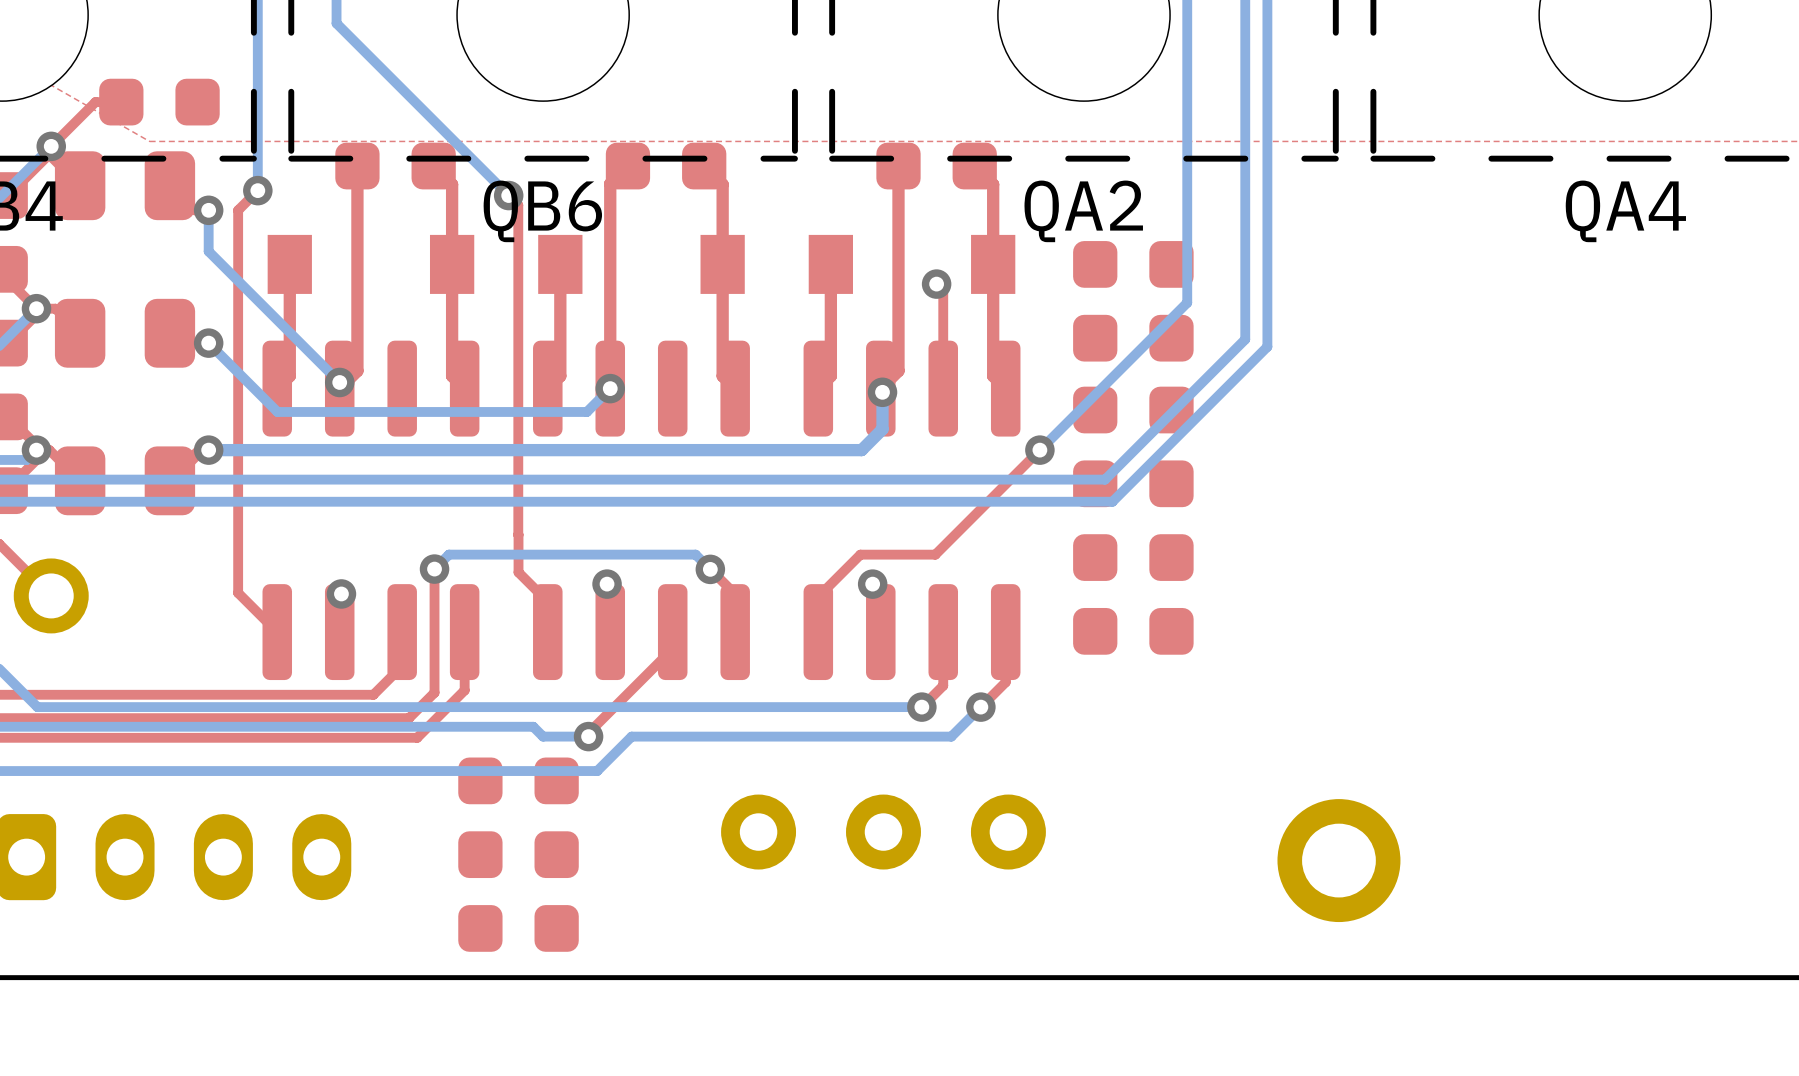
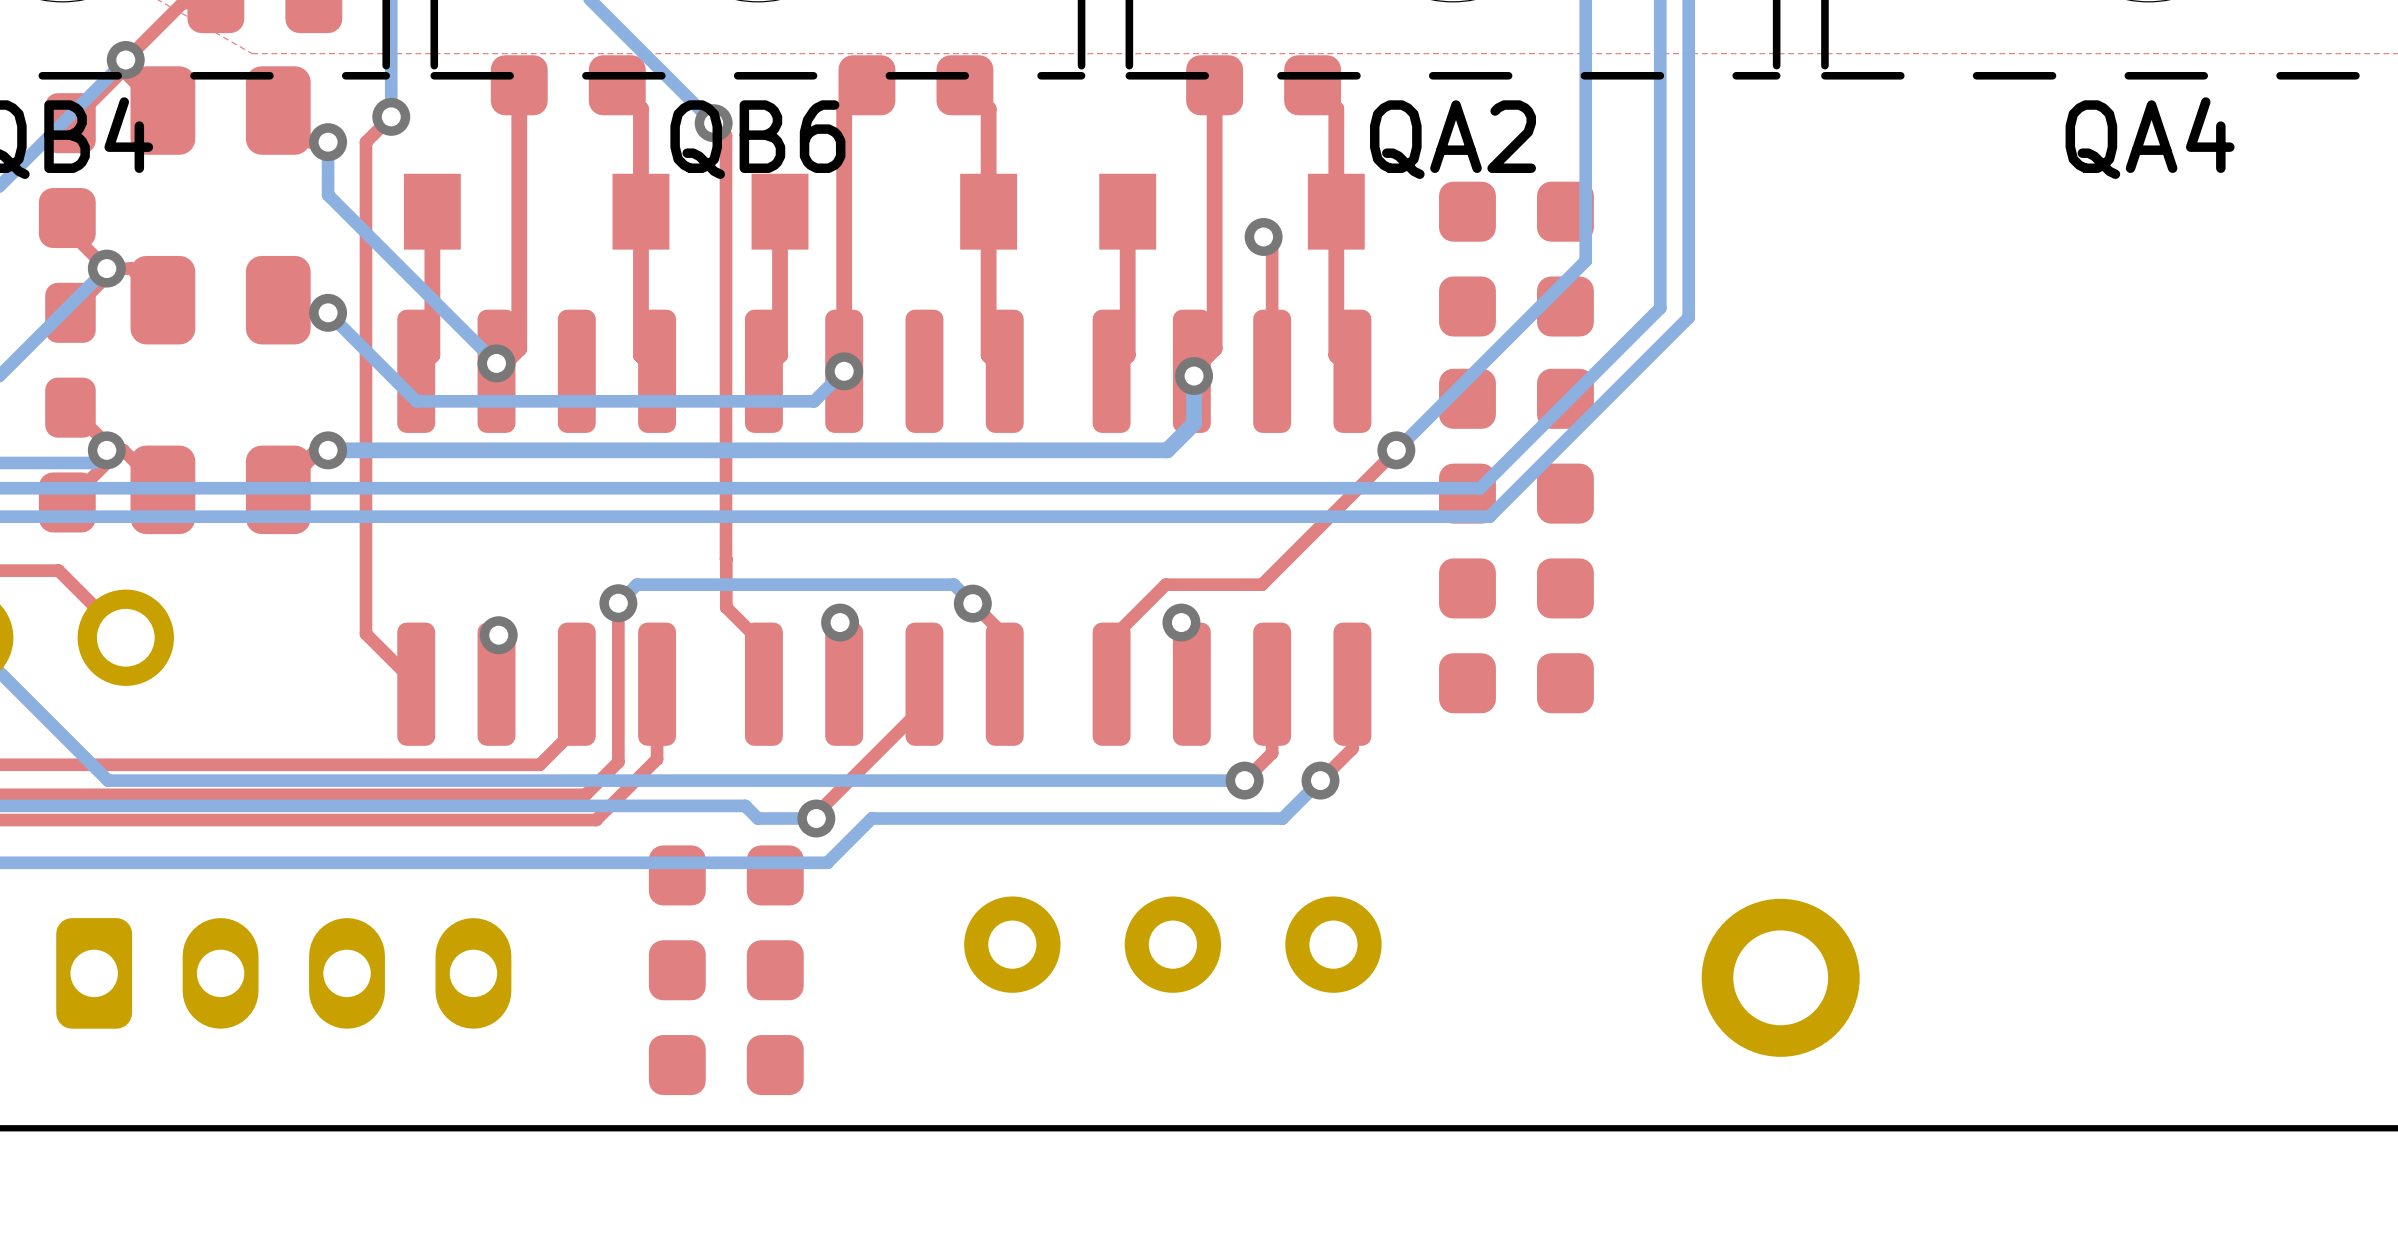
part position: (883, 832) -> (1172, 944)

